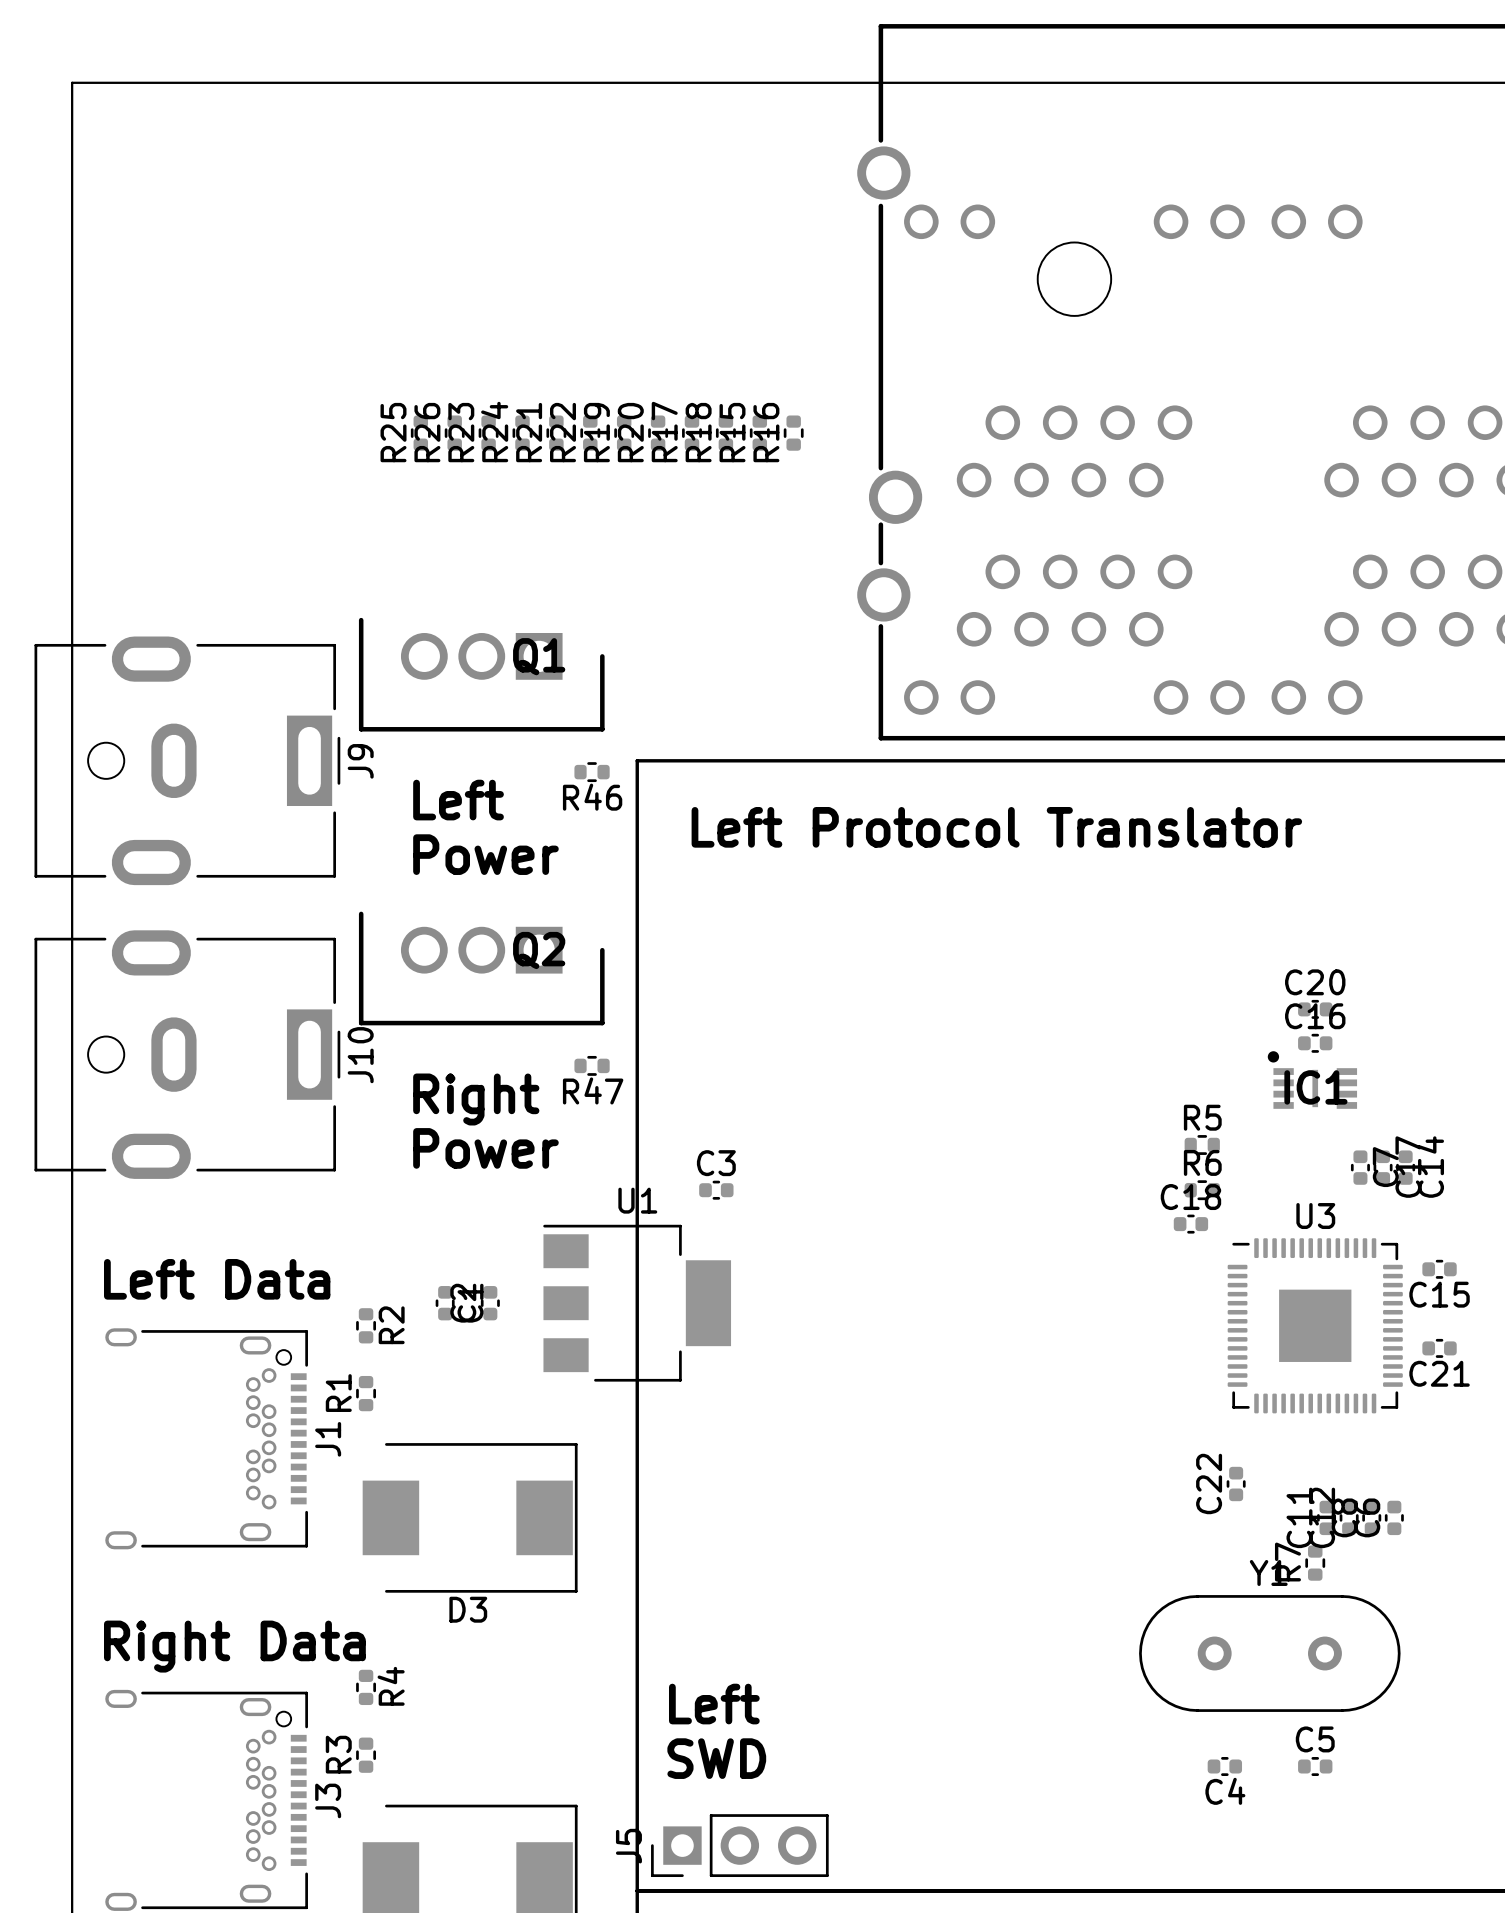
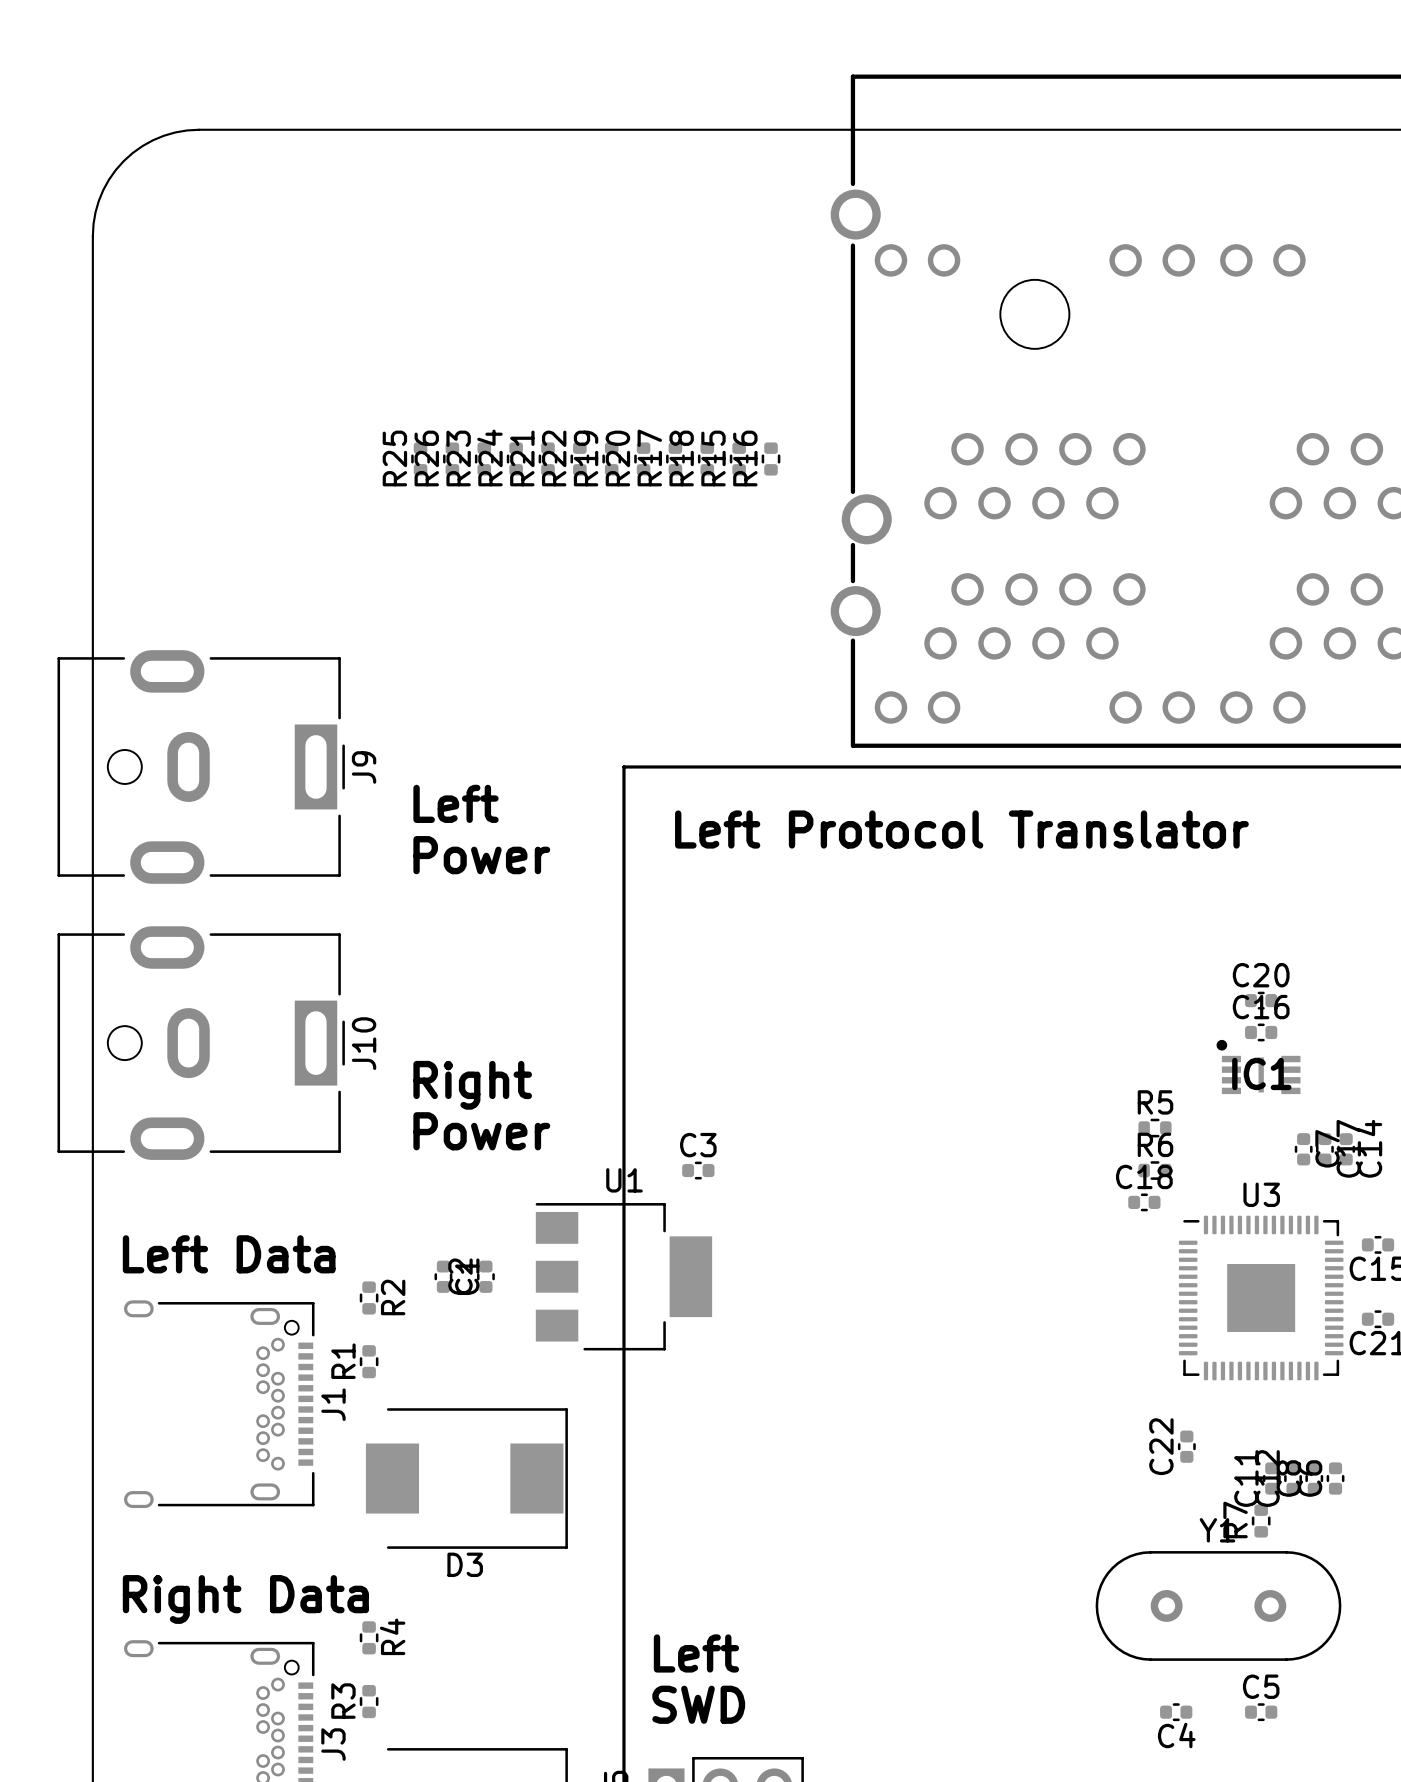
board edge: (185, 82) (72, 82) (72, 195) -> (199, 129) (175, 132) (152, 140) (123, 160) (109, 179) (98, 200) (92, 235)
Q1: (481, 674) -> none
R46: (592, 772) -> none
Q2: (481, 968) -> none
R47: (592, 1065) -> none

